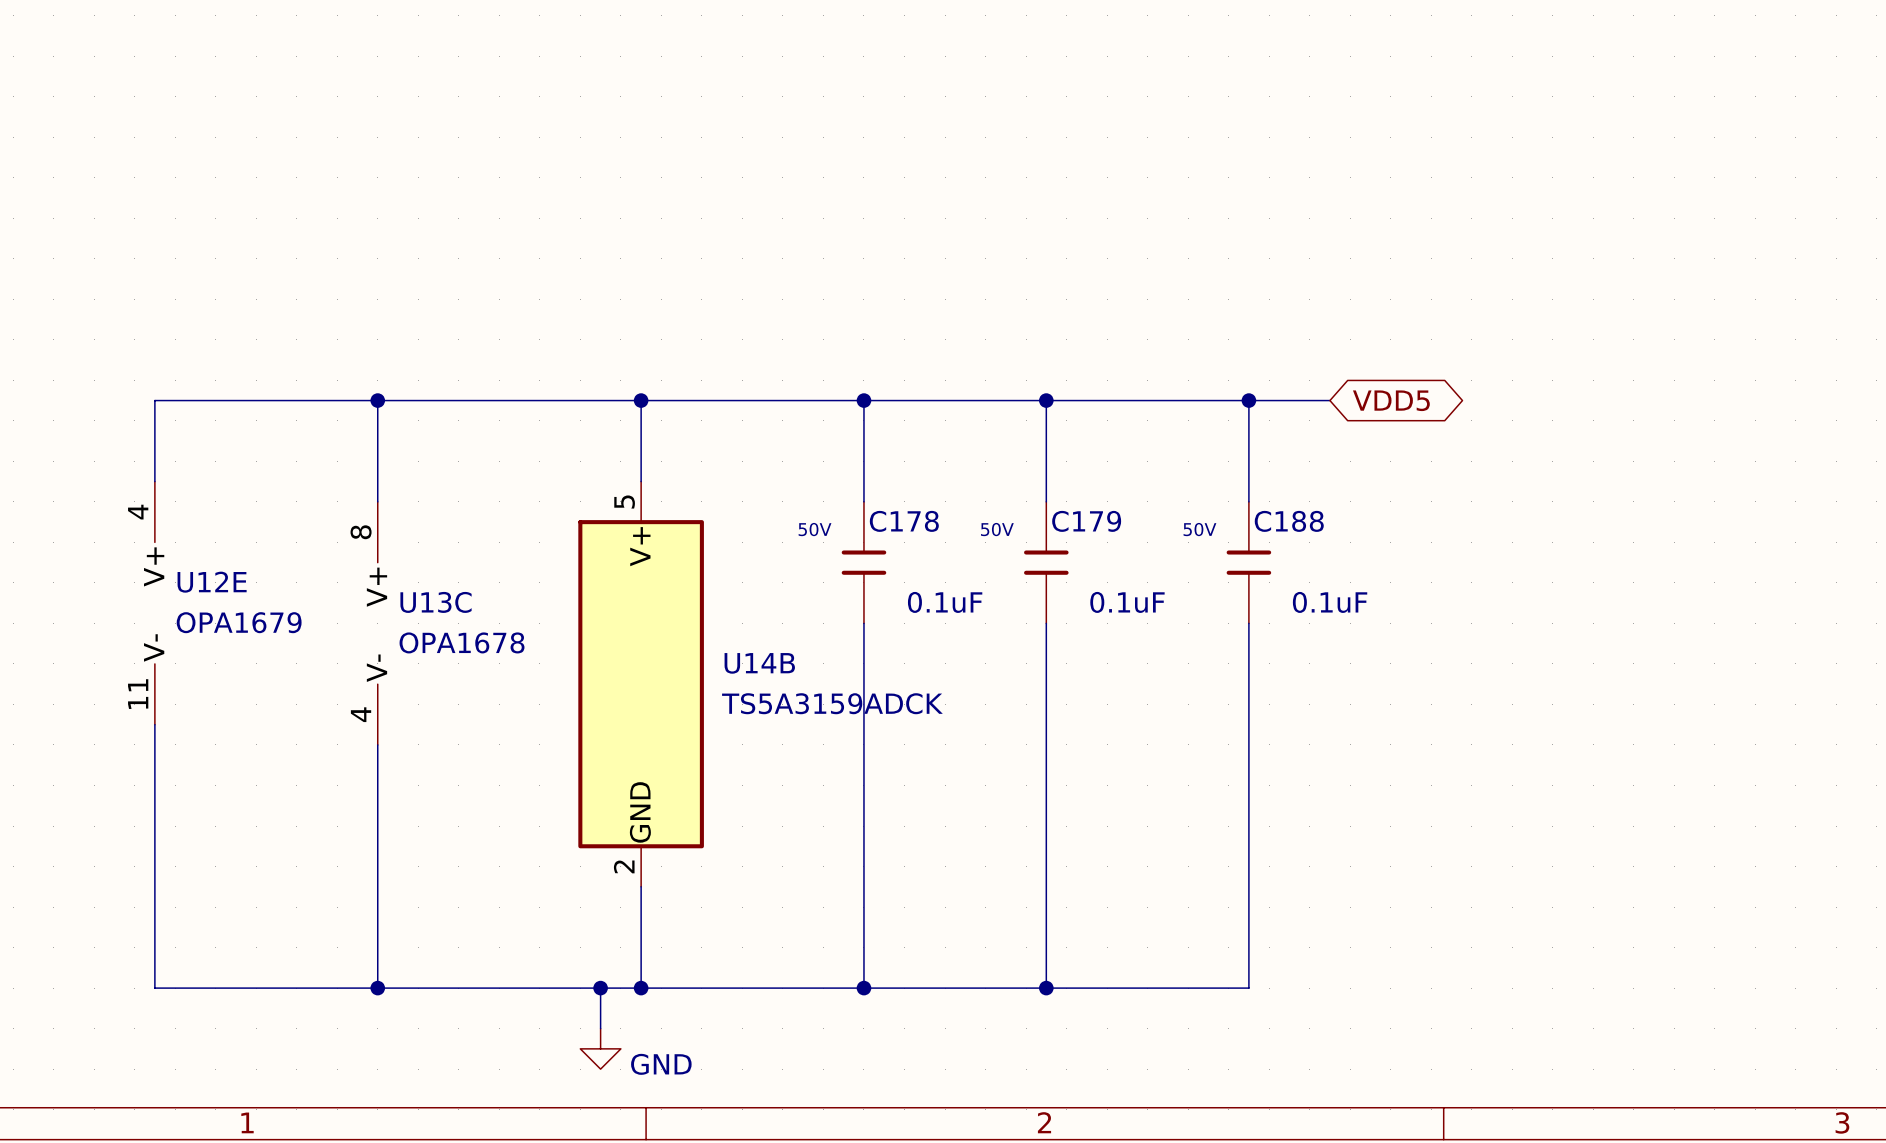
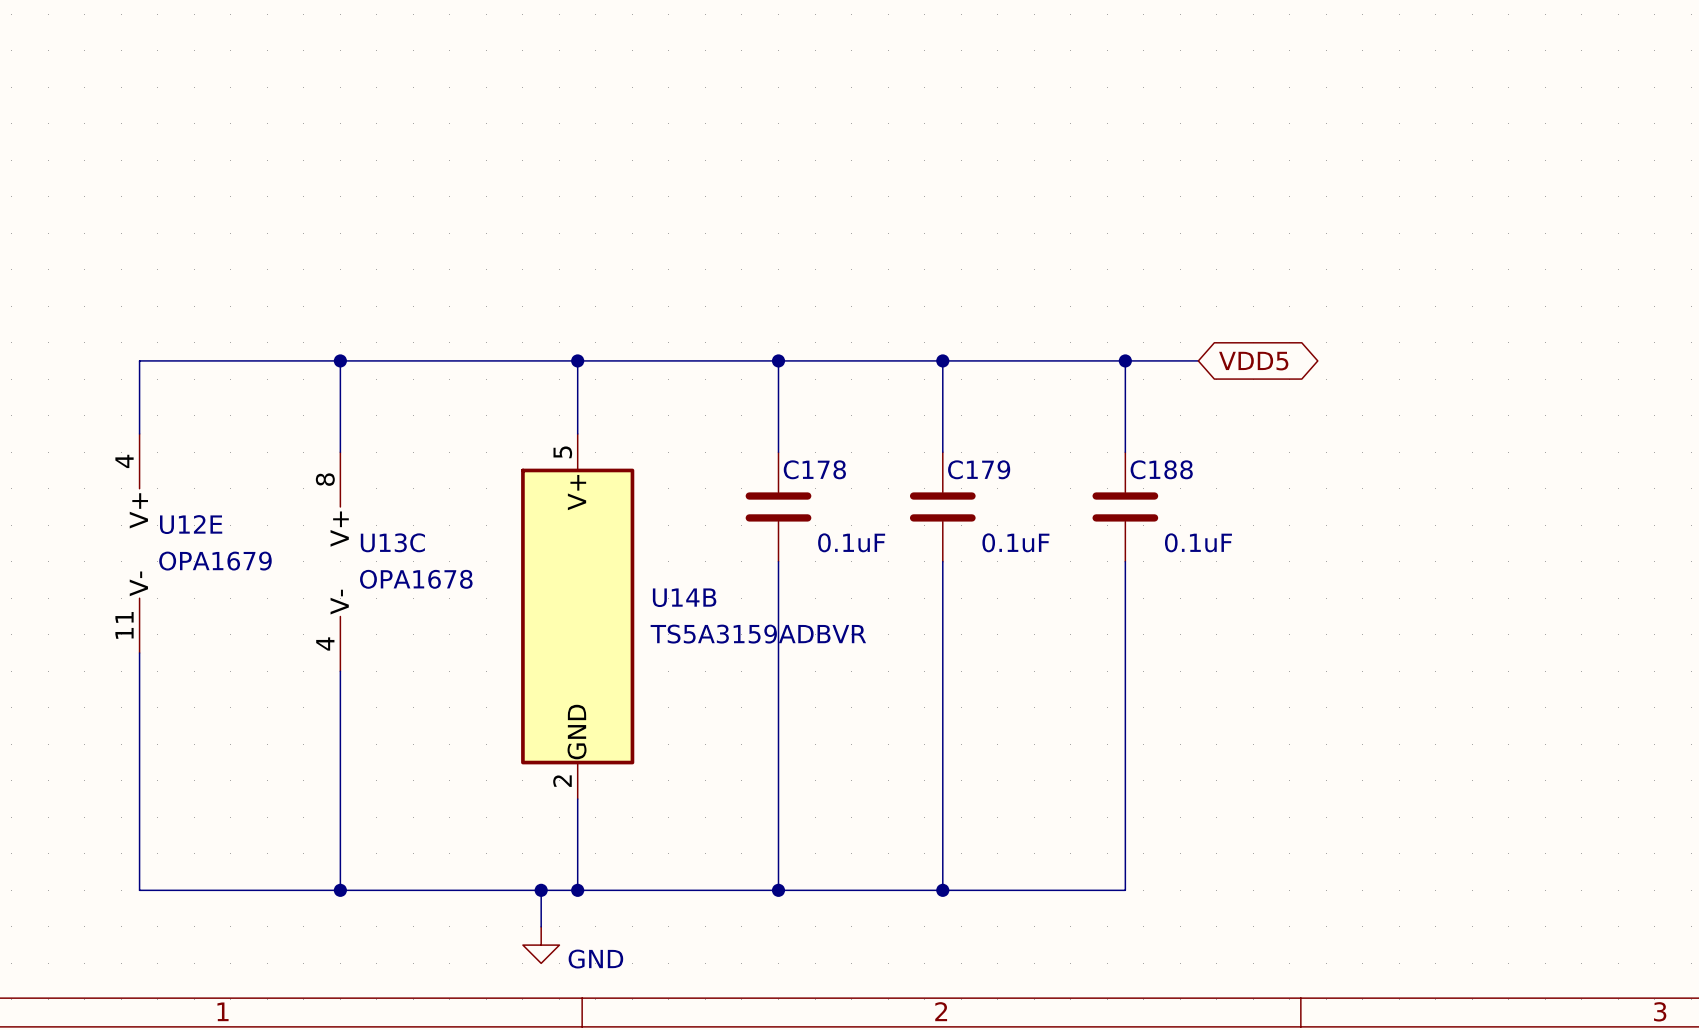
C178 symbol: [841, 501, 887, 624] -> [745, 452, 812, 562]
C179 symbol: [1024, 501, 1069, 624] -> [909, 452, 976, 562]
C188 symbol: [1226, 501, 1272, 624] -> [1092, 452, 1159, 562]
C178 text: 50V (815, 529) -> none
C179 text: 50V (997, 529) -> none
C188 text: 50V (1199, 529) -> none
U14B value: TS5A3159ADCK (832, 703) -> TS5A3159ADBVR (758, 634)

